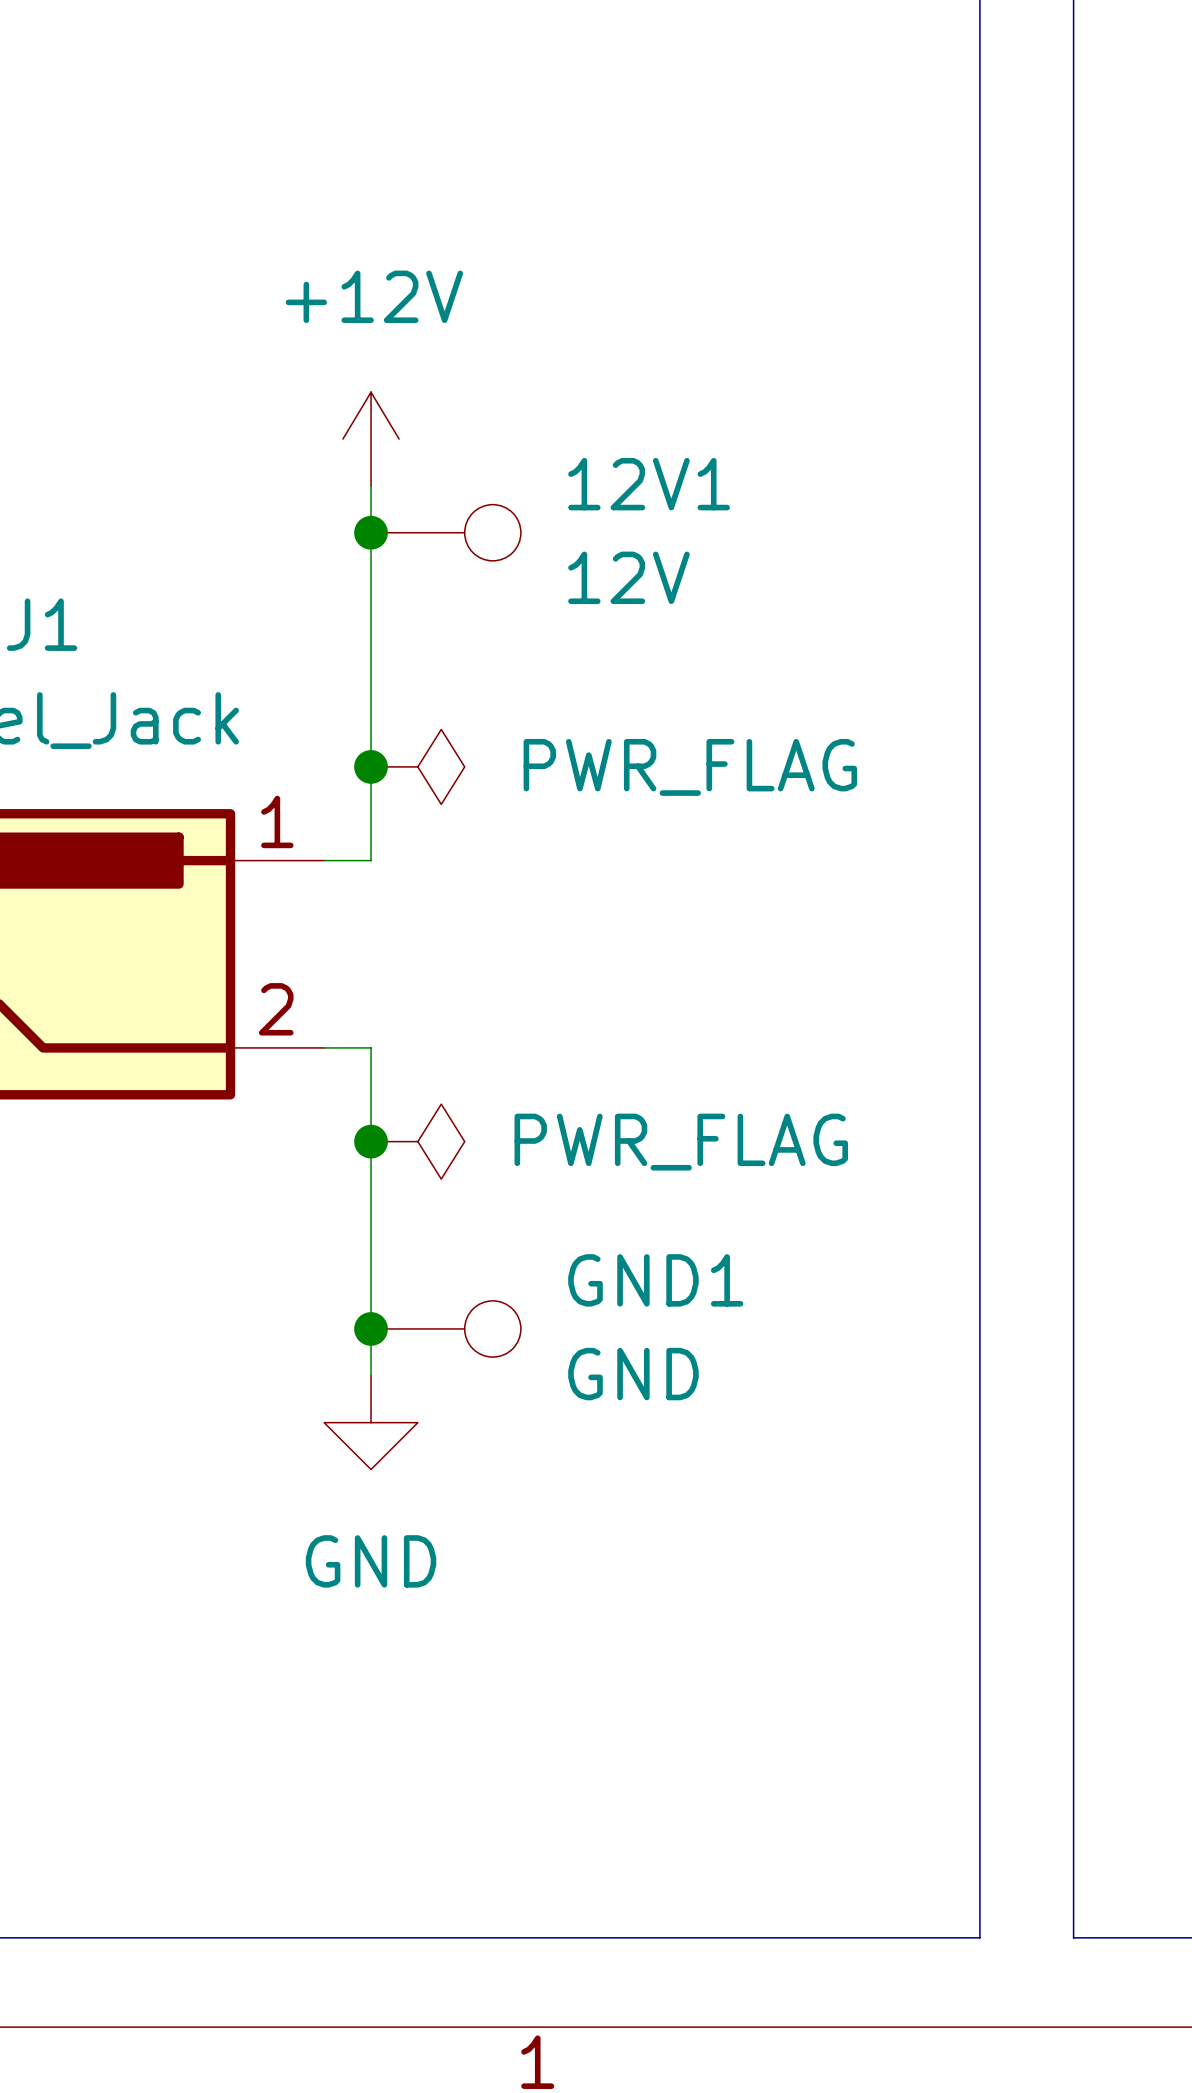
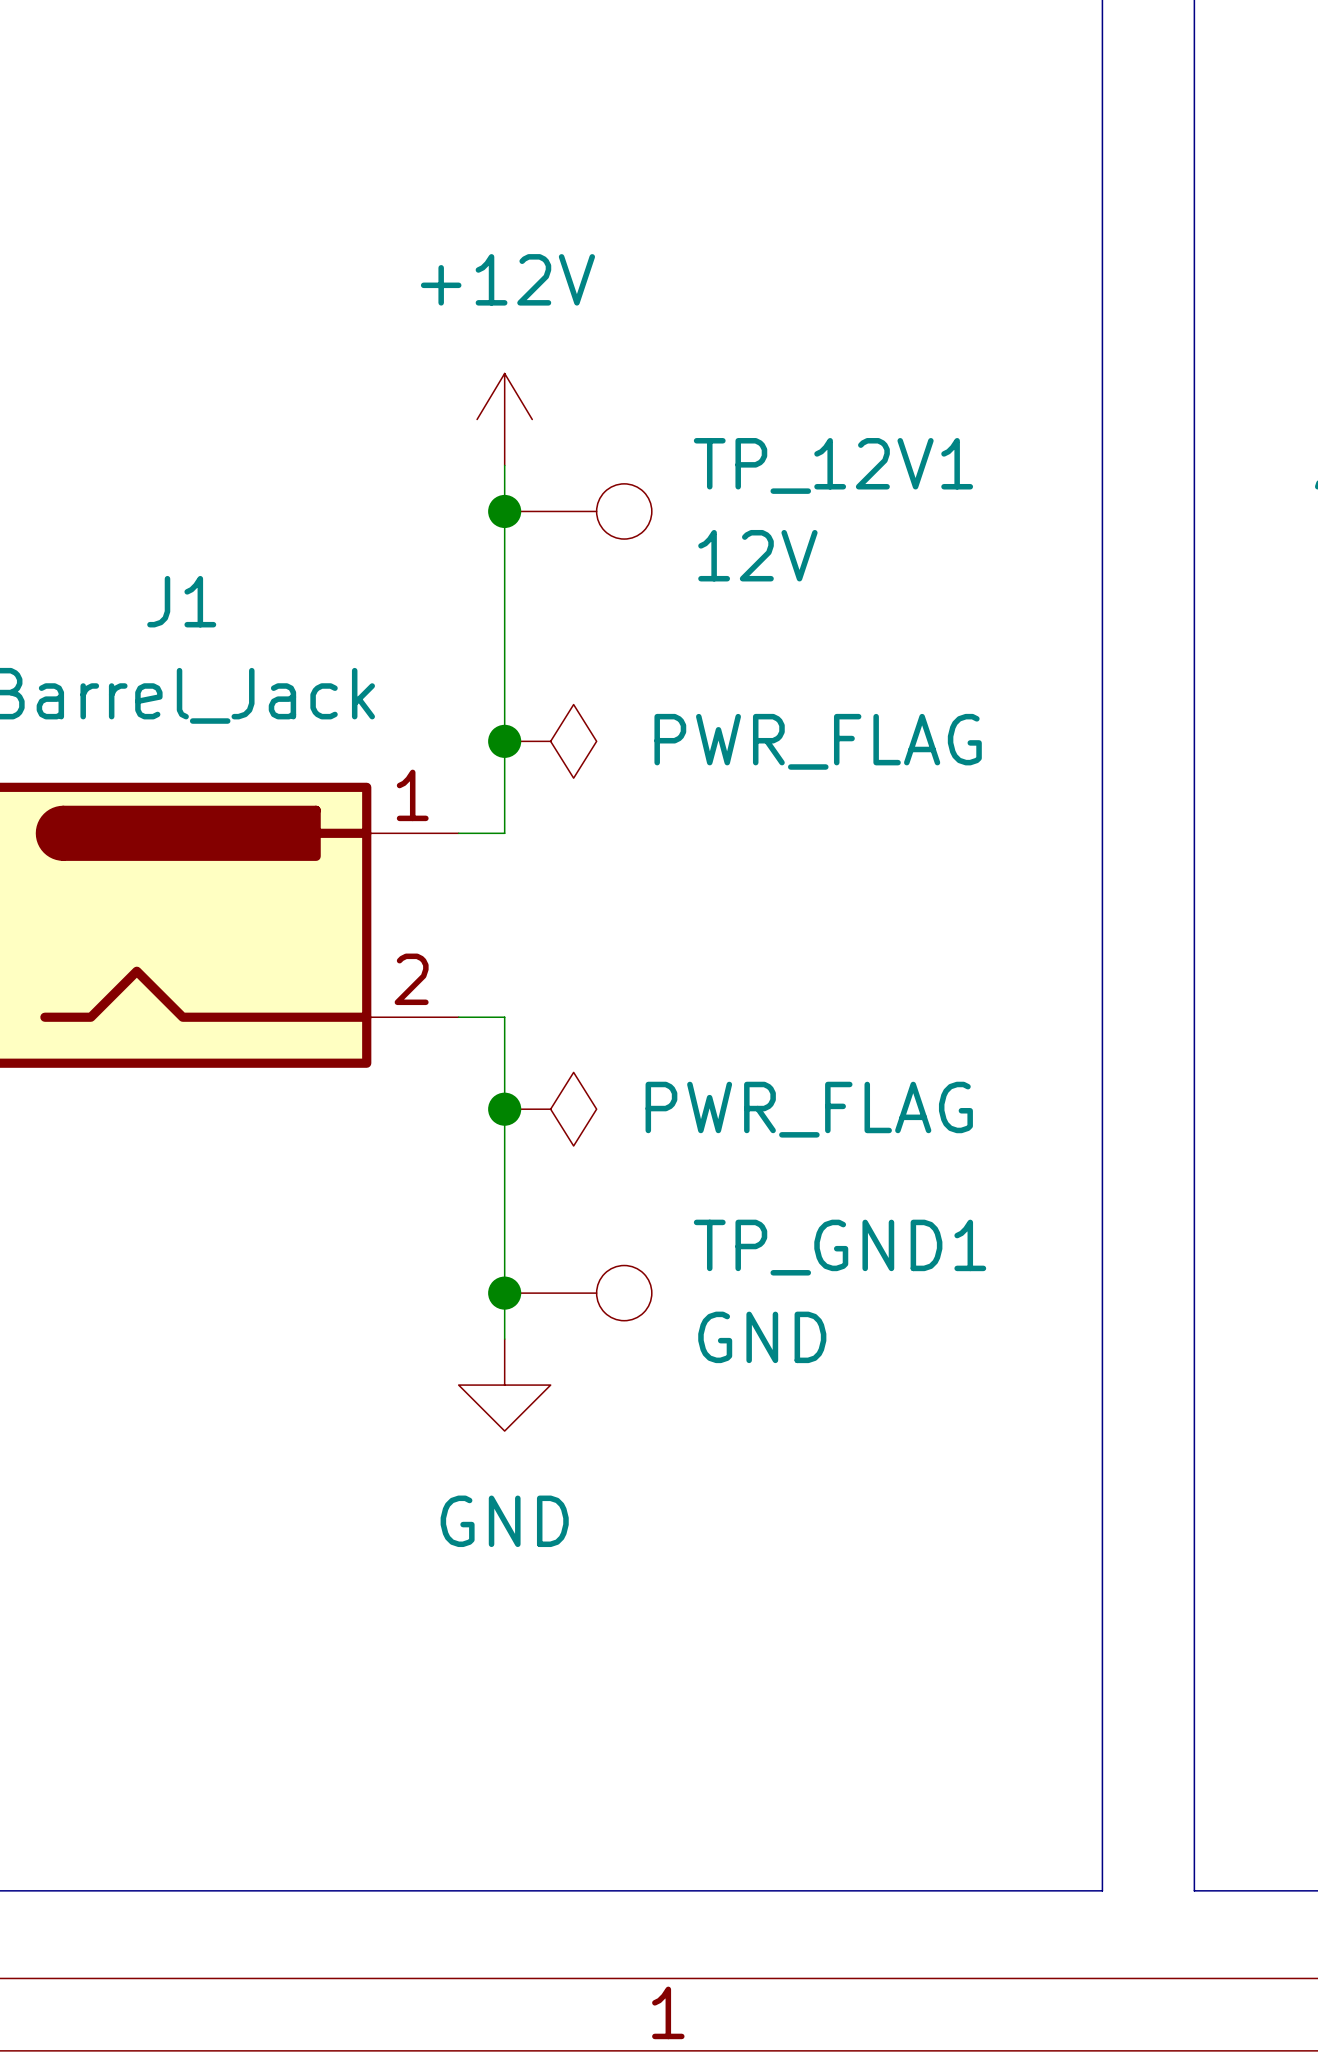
12V1 name: 12V1 (649, 484) -> TP_12V1 (833, 465)
GND1 name: GND1 (655, 1280) -> TP_GND1 (840, 1247)

